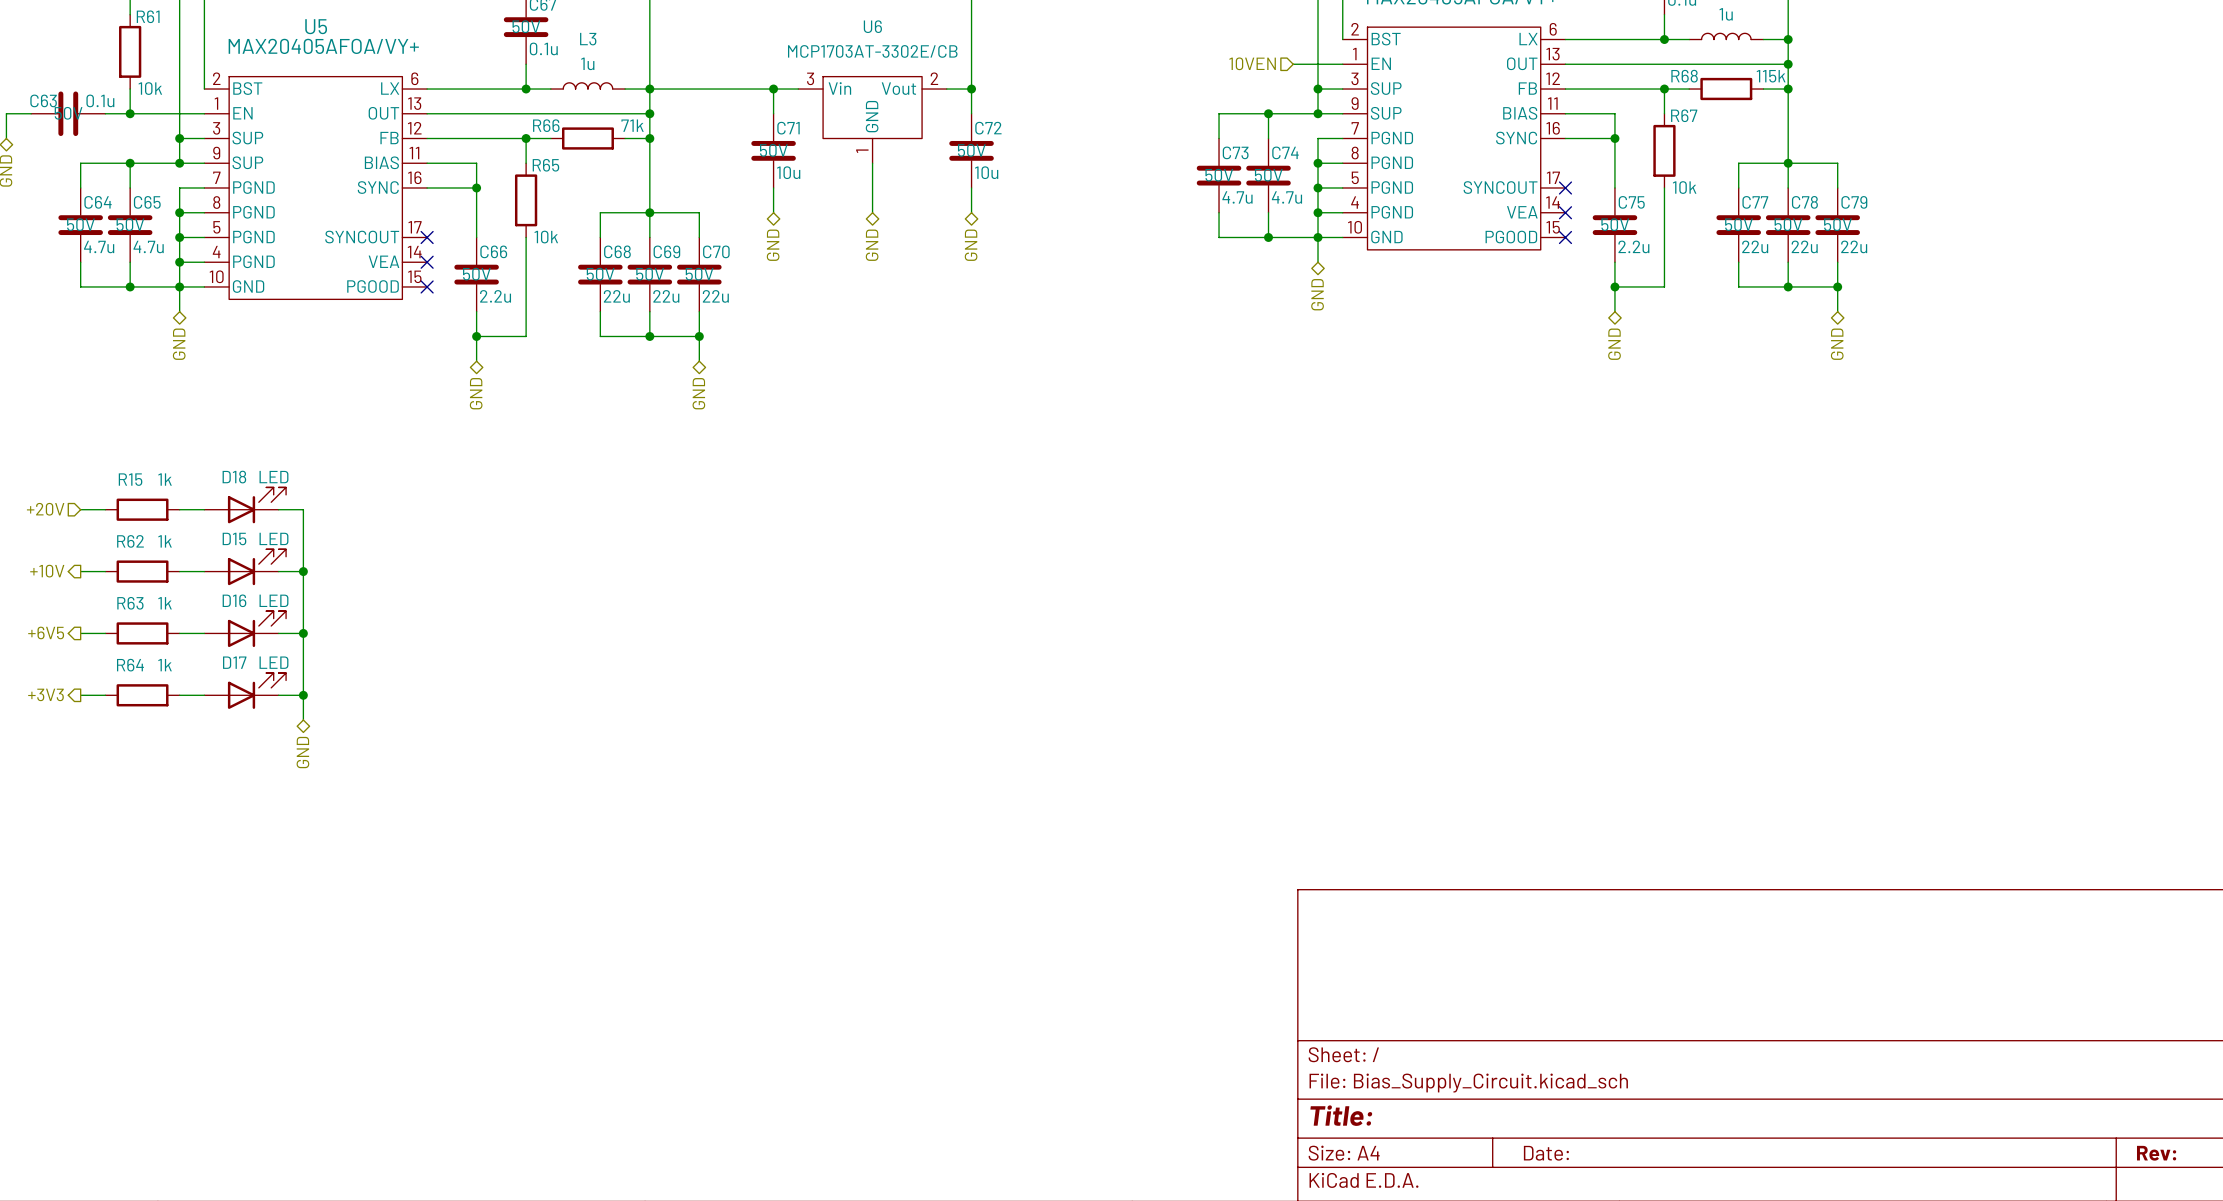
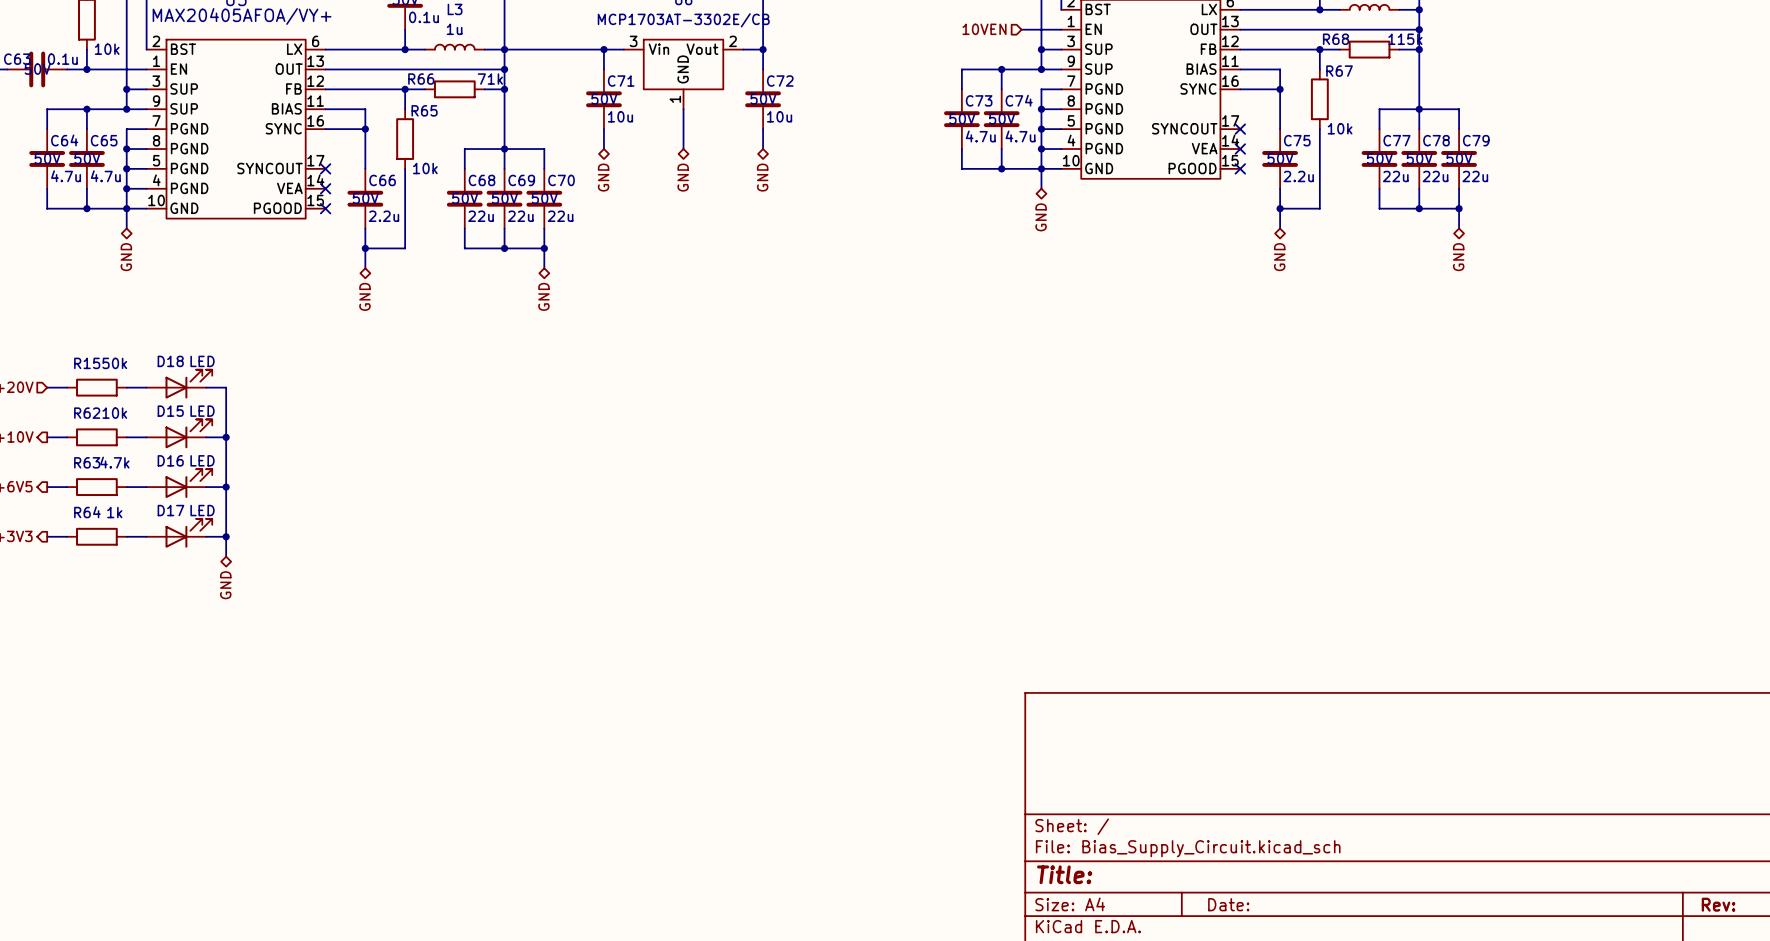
R15 value: 1k (165, 479) -> 50k (114, 363)
R62 value: 1k (165, 541) -> 10k (114, 413)
R63 value: 1k (165, 603) -> 4.7k (114, 462)

